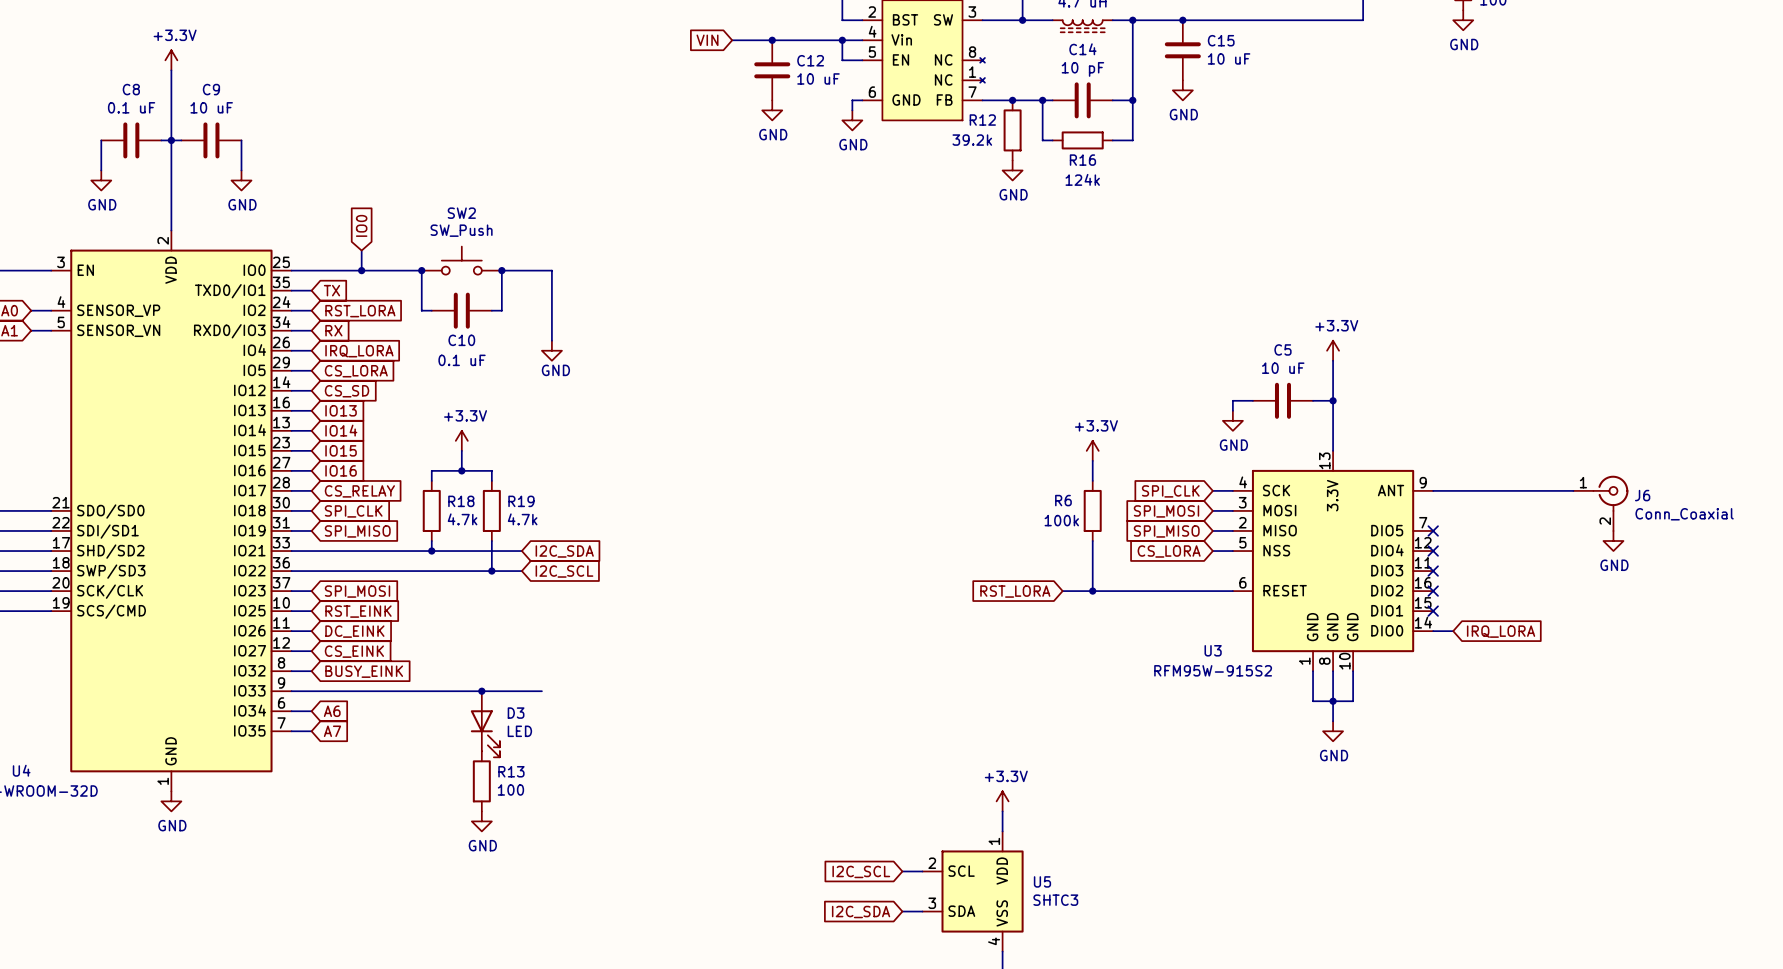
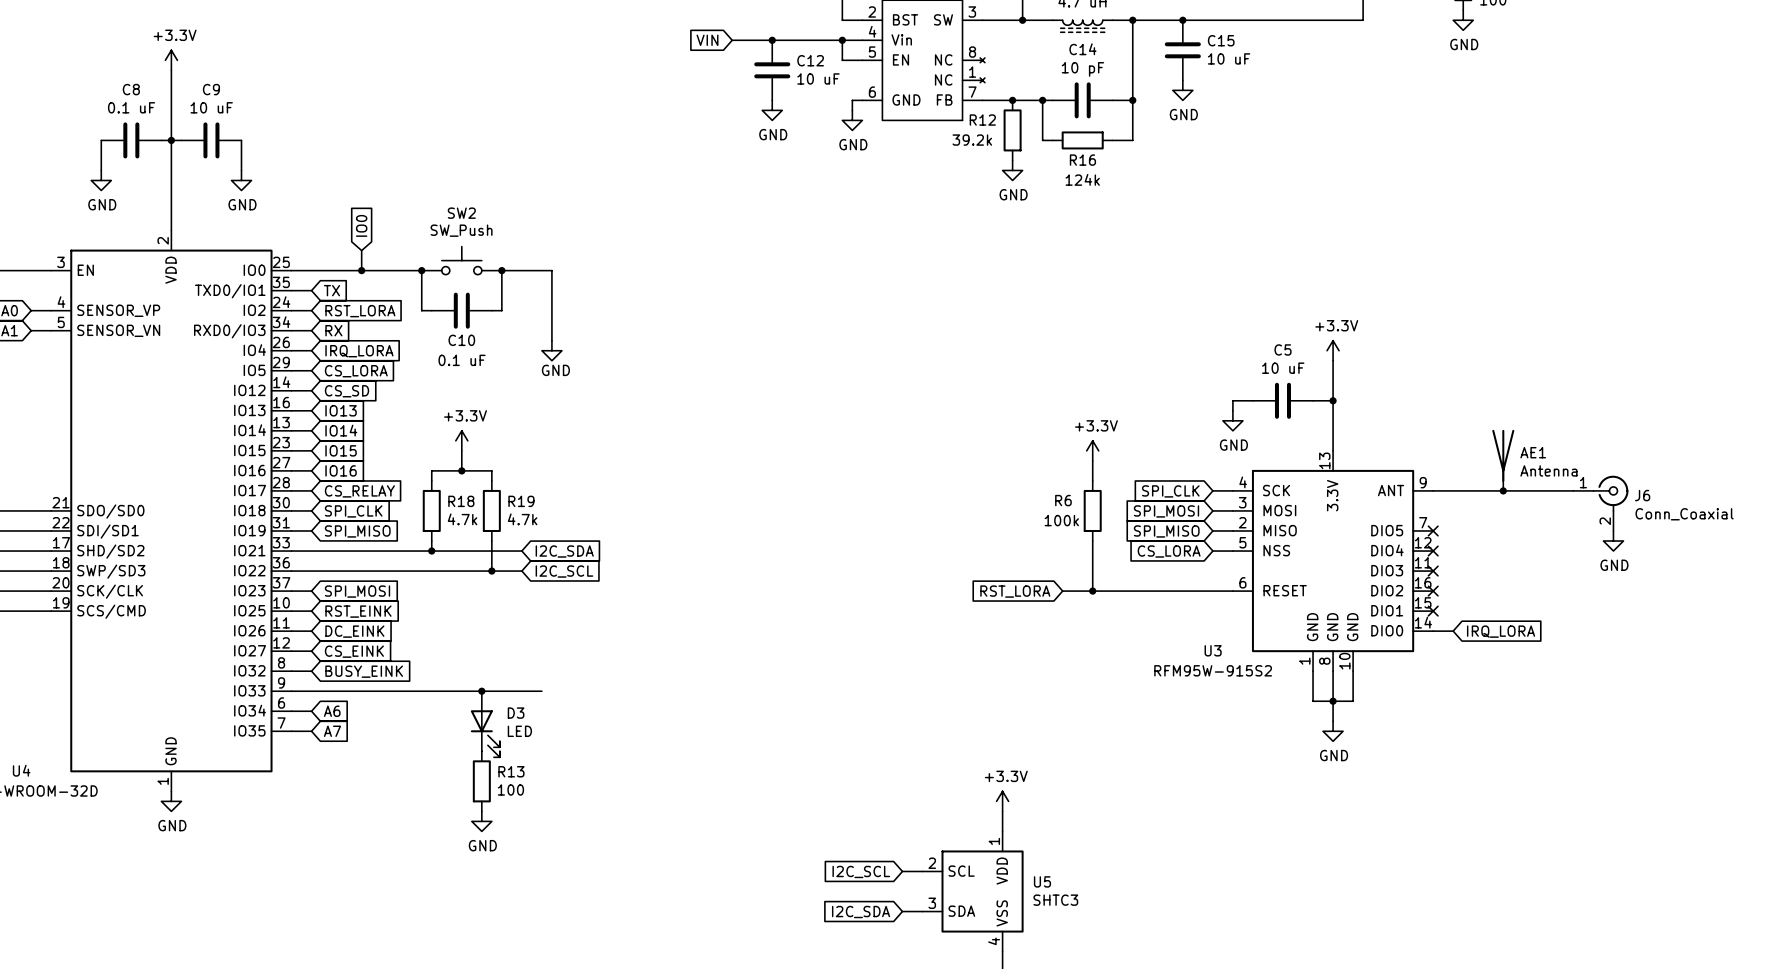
AE1: none -> Antenna (1503, 460)
junction: none -> (1503, 490)

